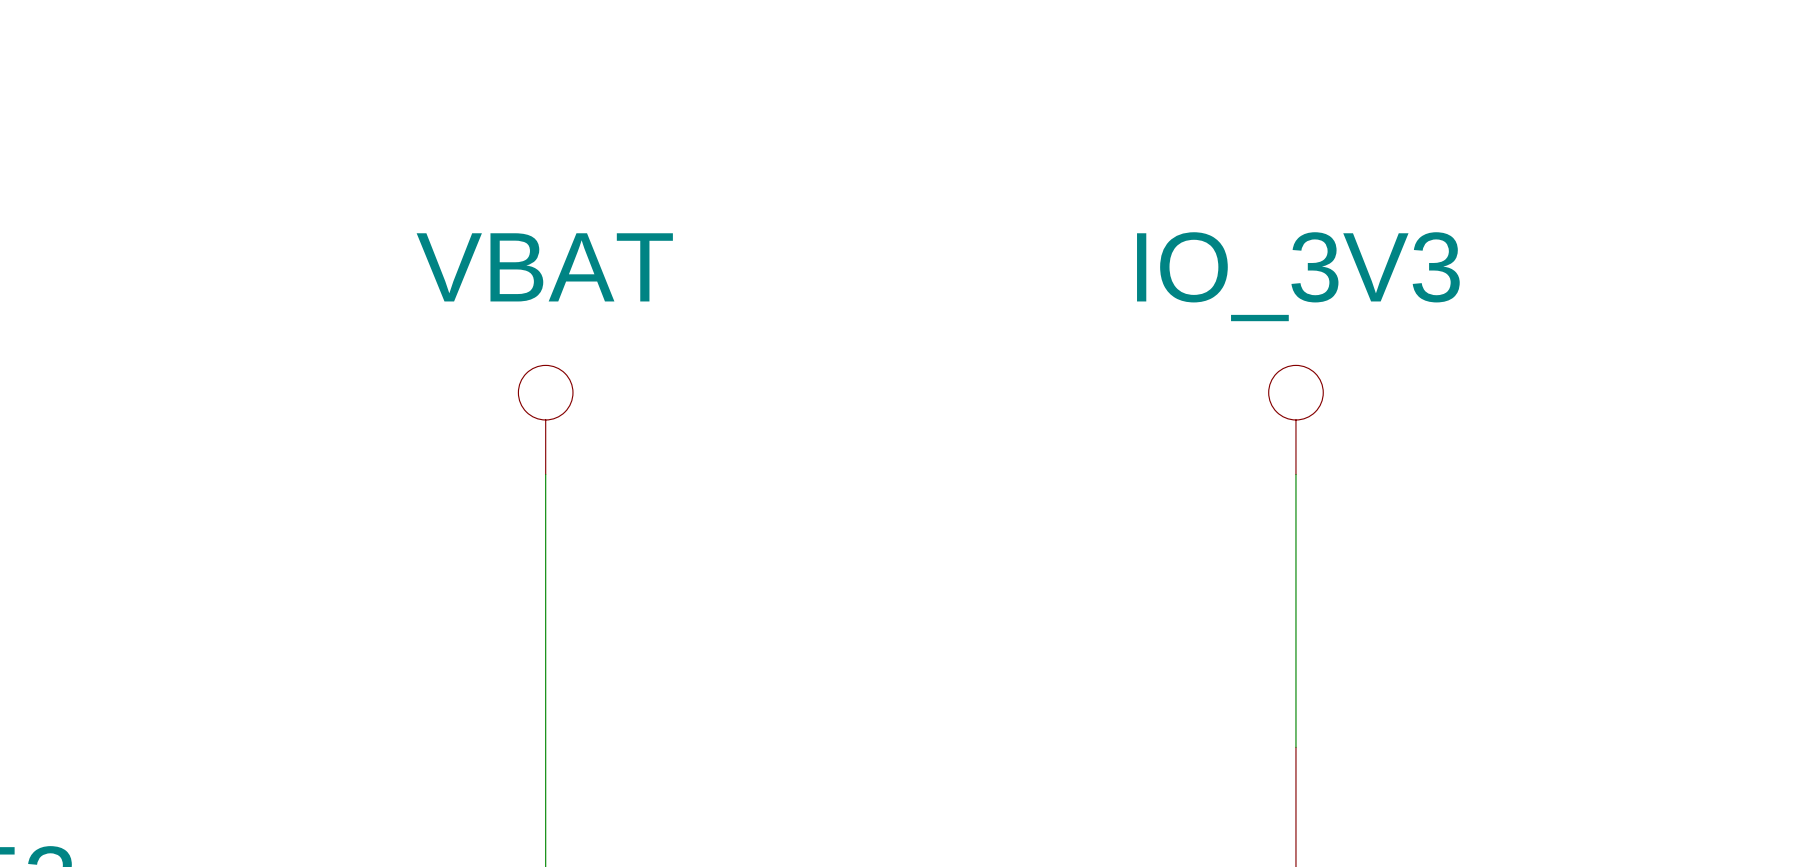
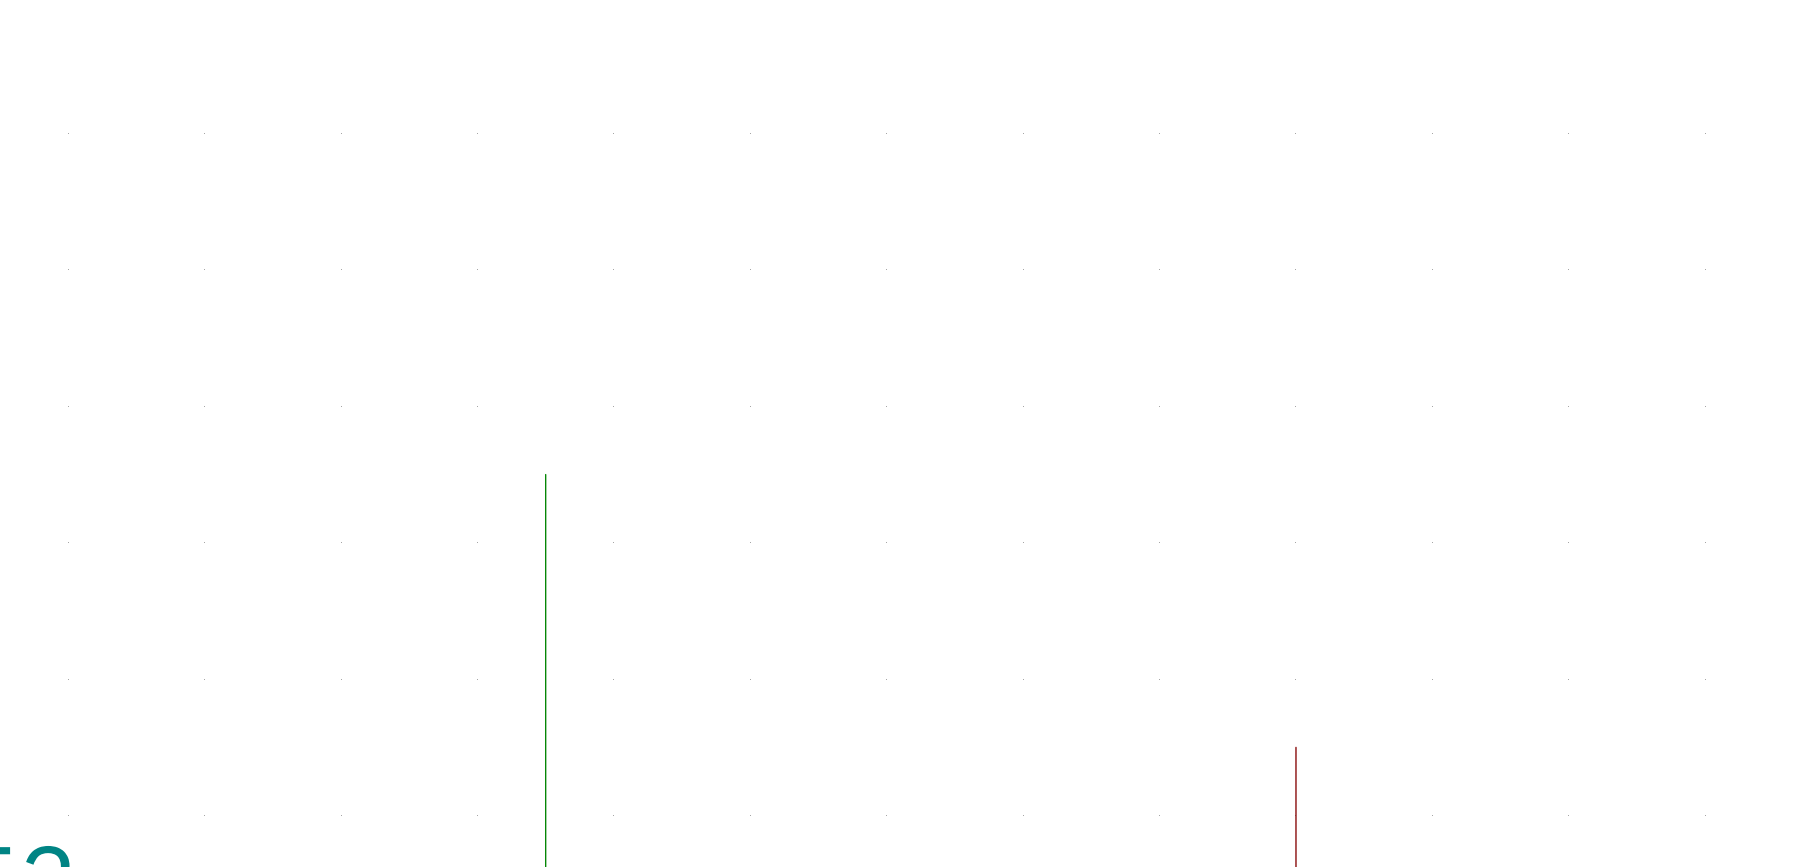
power symbol: VBAT (545, 419) -> none
power symbol: IO_3V3 (1295, 419) -> none
wire: (1295, 474) (1295, 747) -> none

